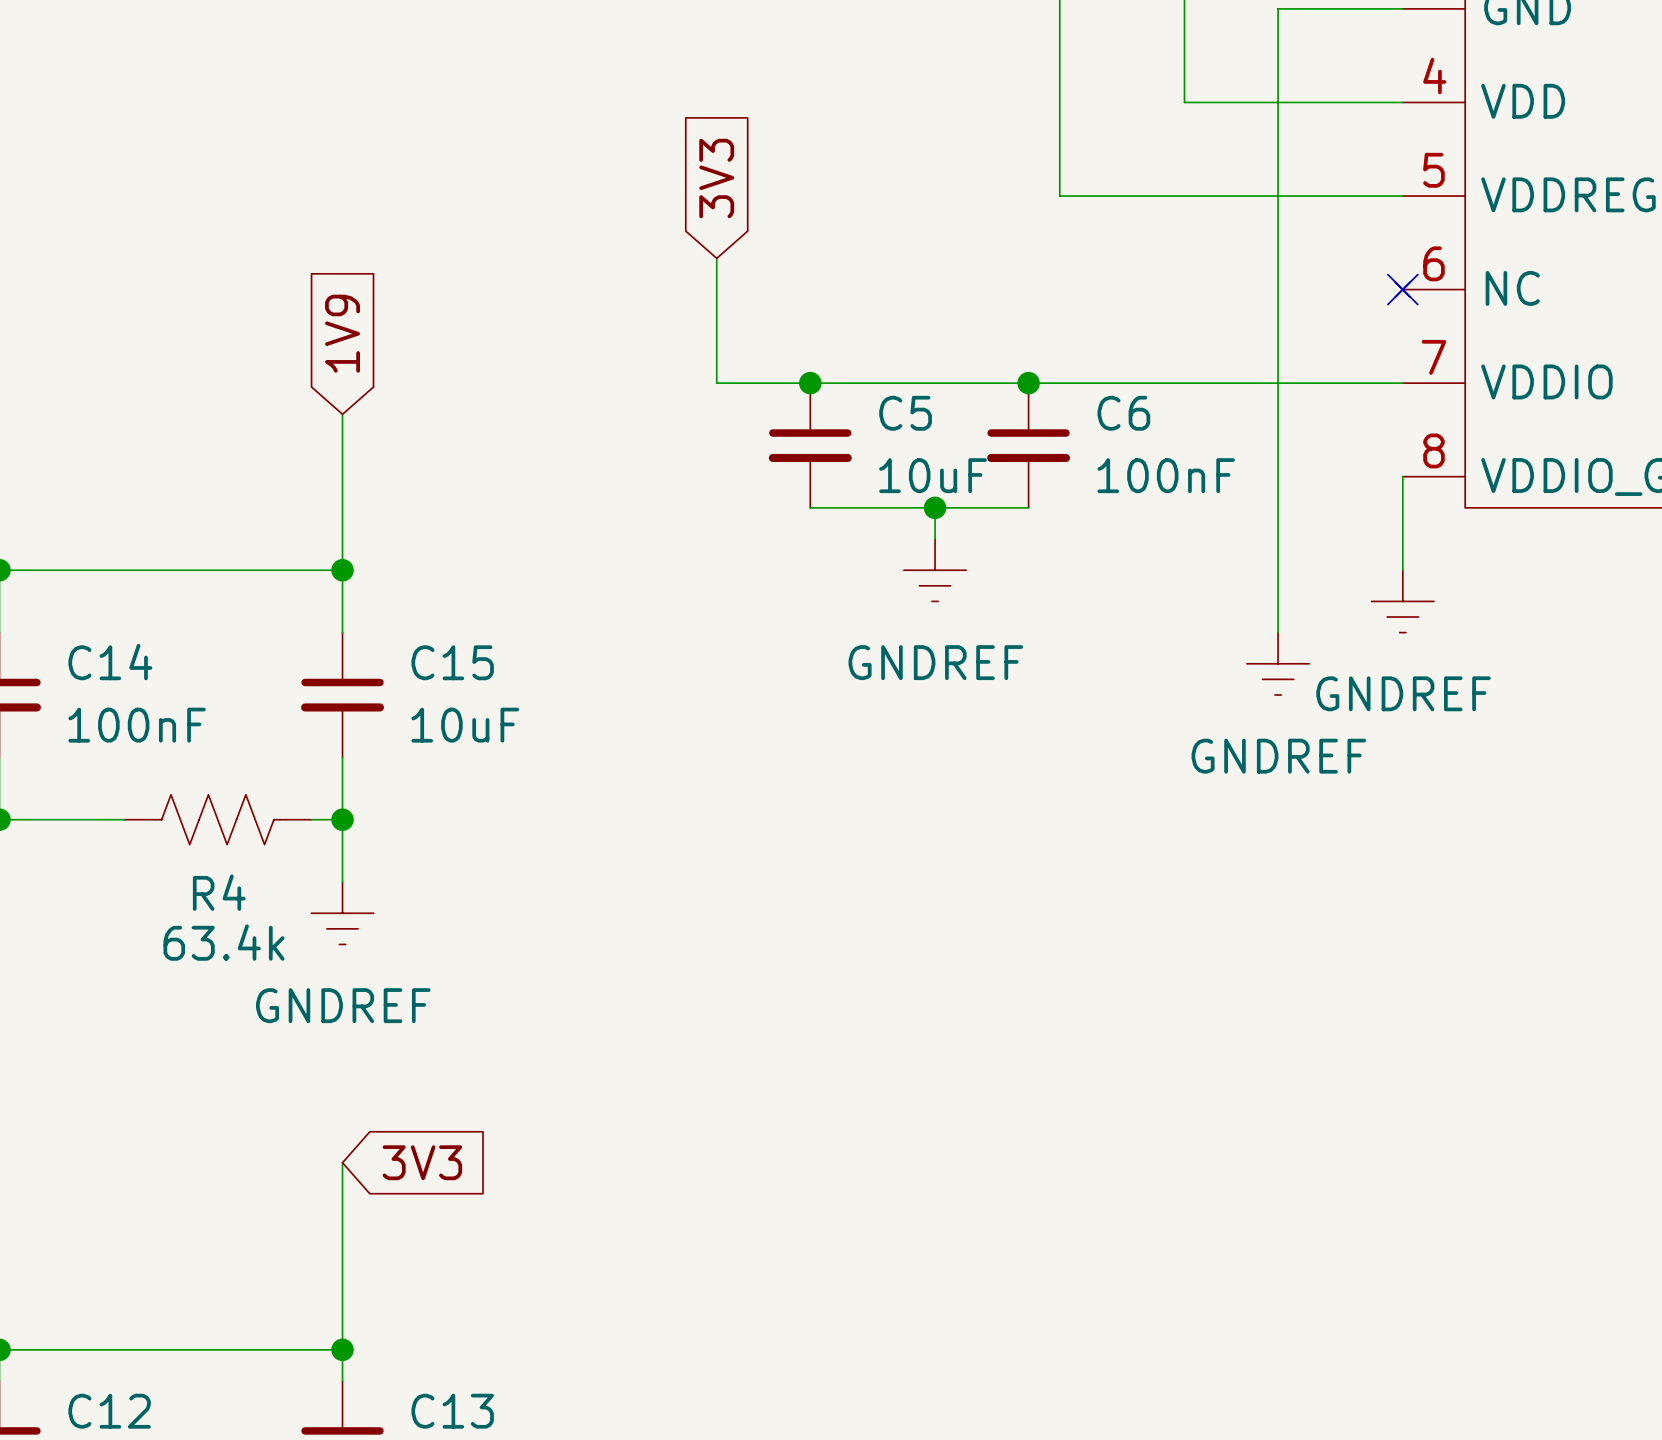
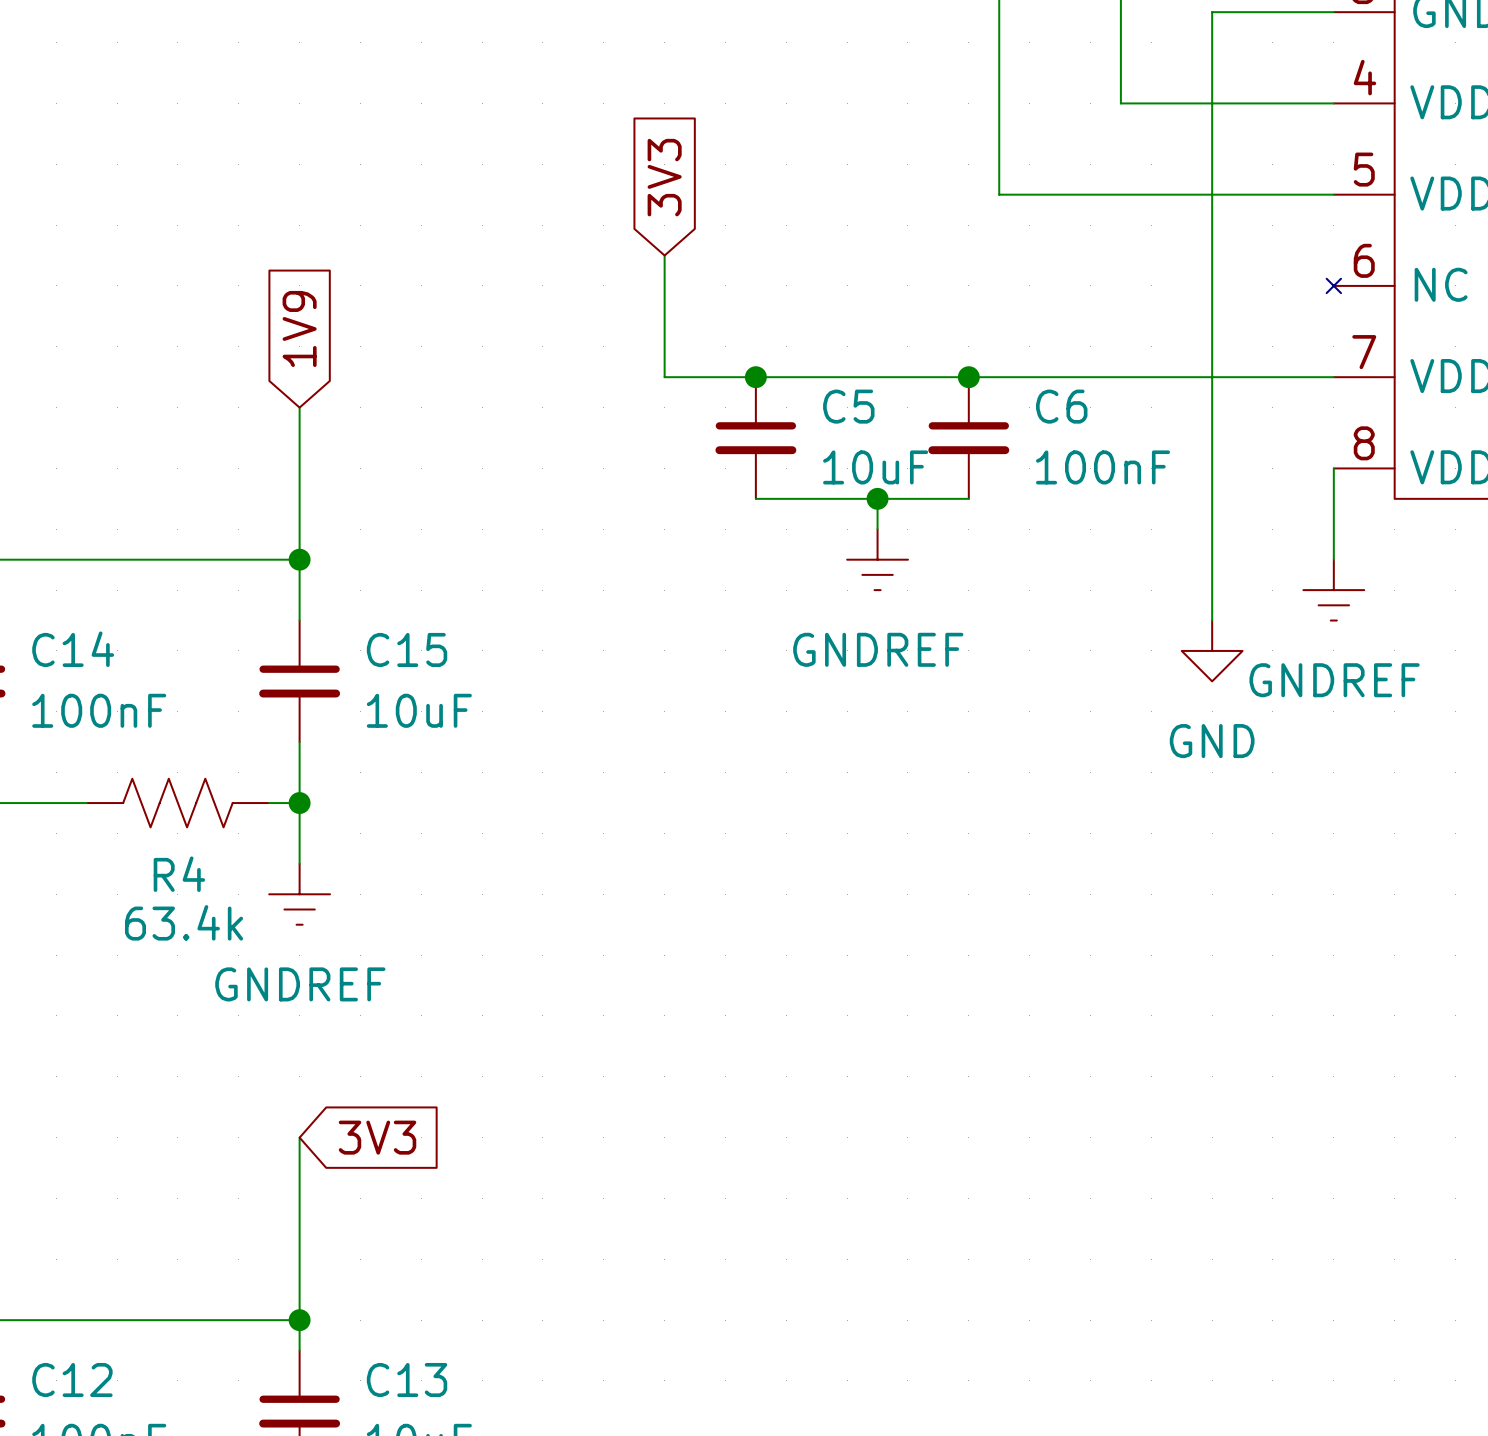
no-connect mark: (1402, 289) -> none
power symbol: GNDREF (1278, 663) -> GND (1212, 650)

